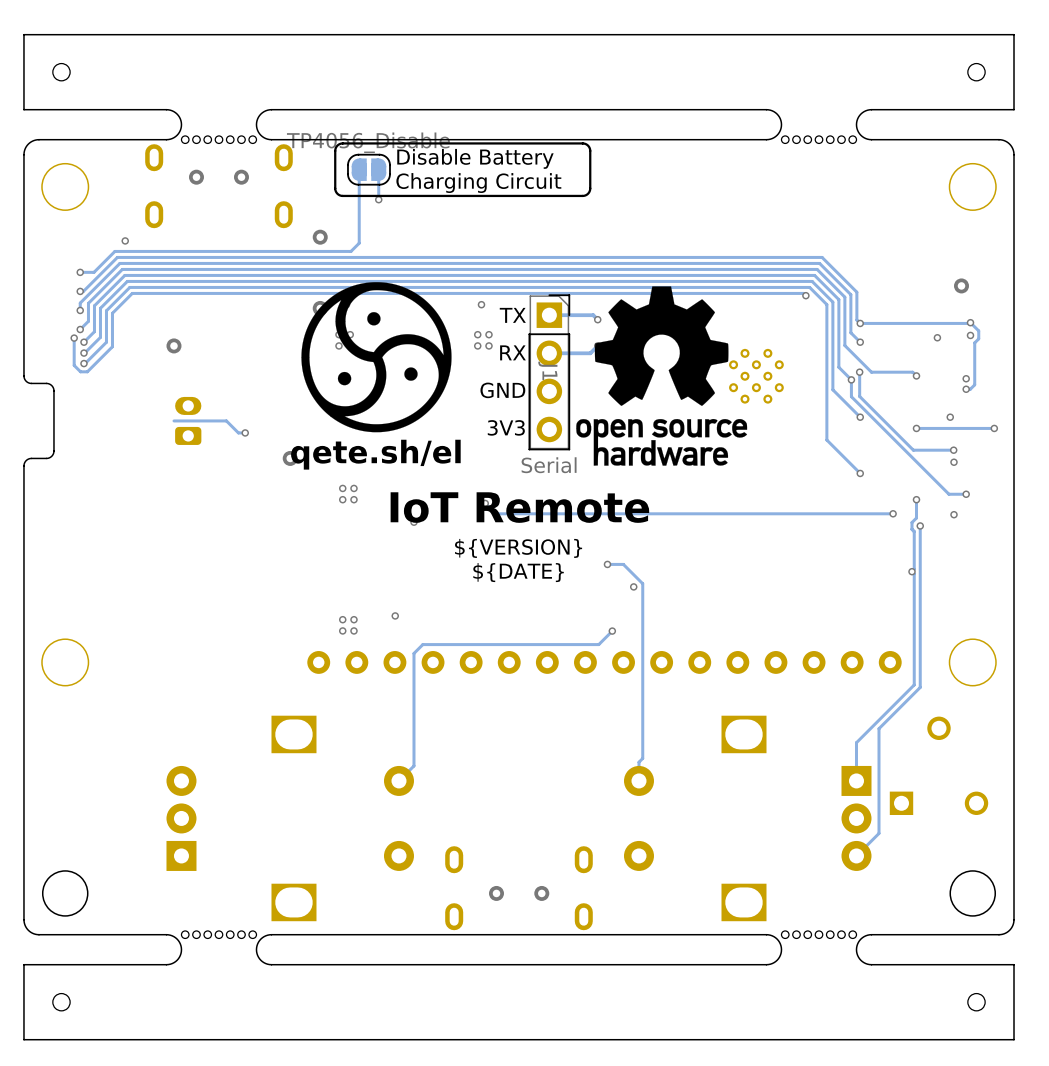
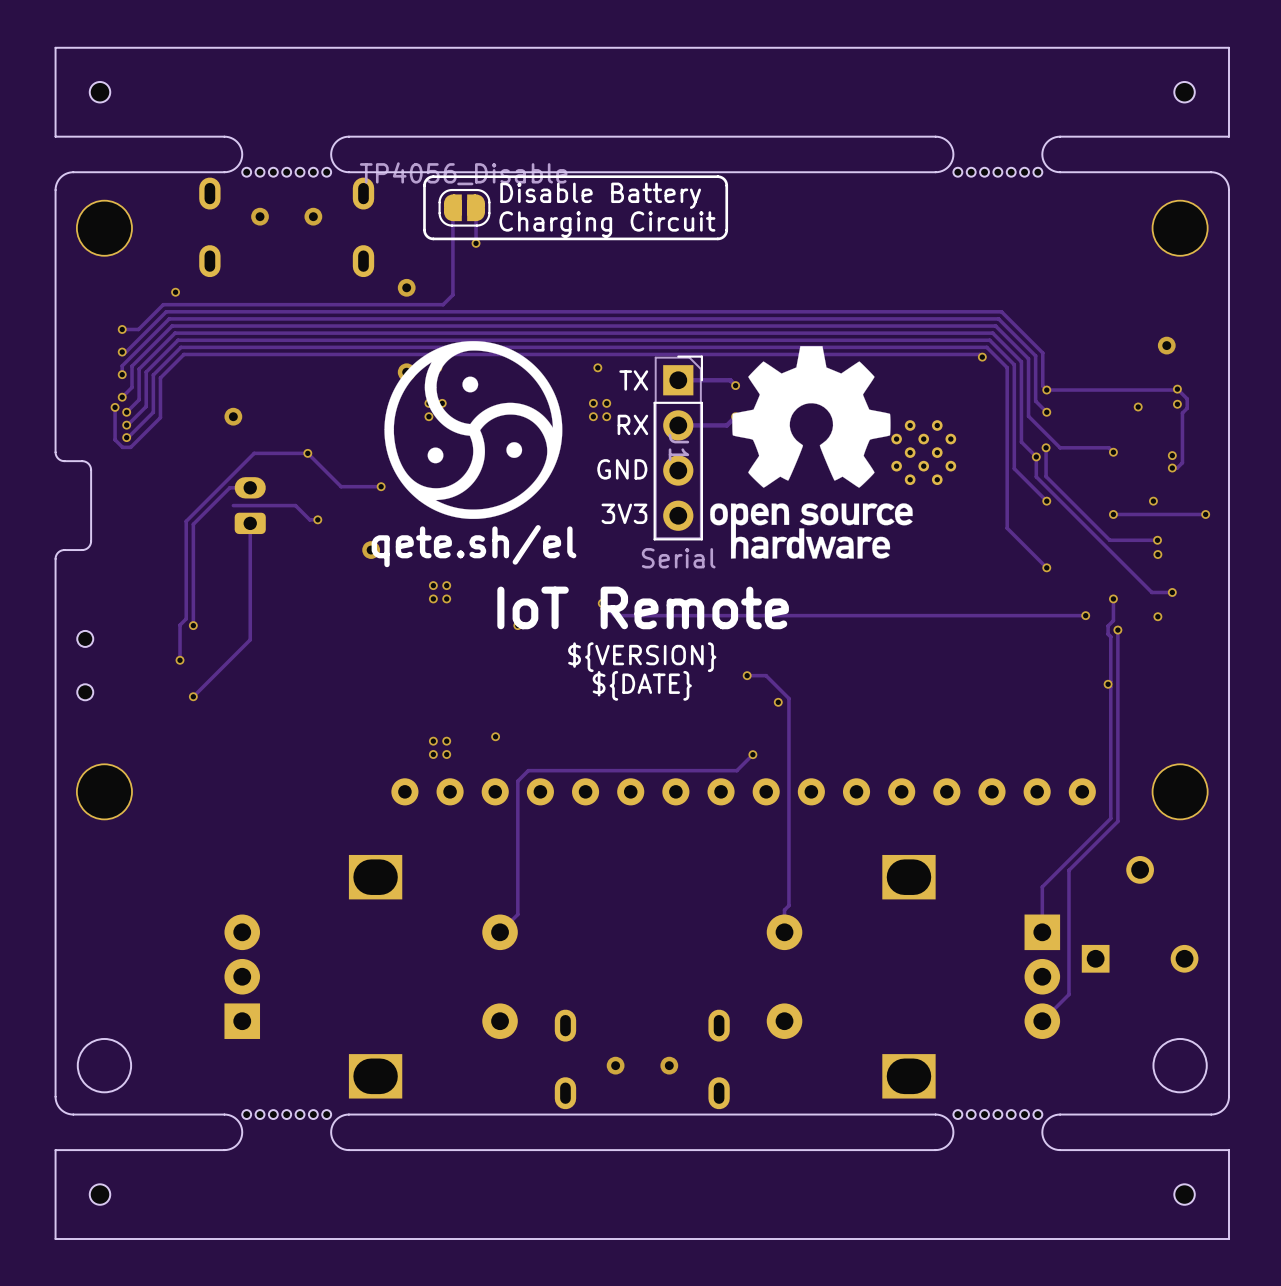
via: none -> (307, 453)
track: none -> (250, 487) (229, 487) (193, 524) (193, 625)
track: none -> (381, 486) (341, 486) (307, 453) (254, 453) (186, 521) (186, 618) (180, 625) (180, 660)
via: none -> (381, 486)
track: none -> (250, 523) (250, 639) (193, 696)
via: none -> (193, 625)
via: none -> (180, 660)
part: none -> (85, 665)
via: none -> (193, 696)

